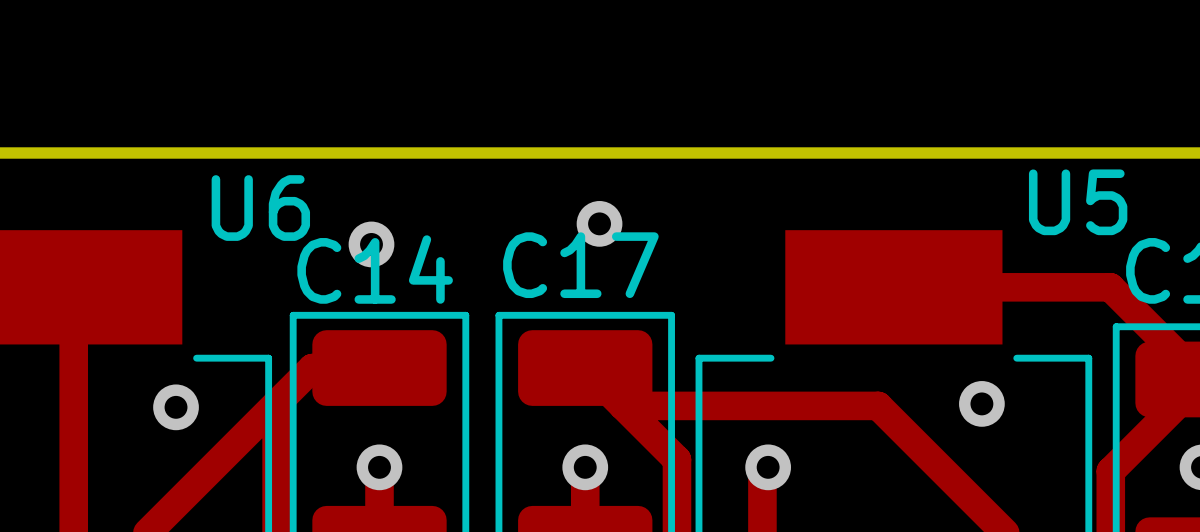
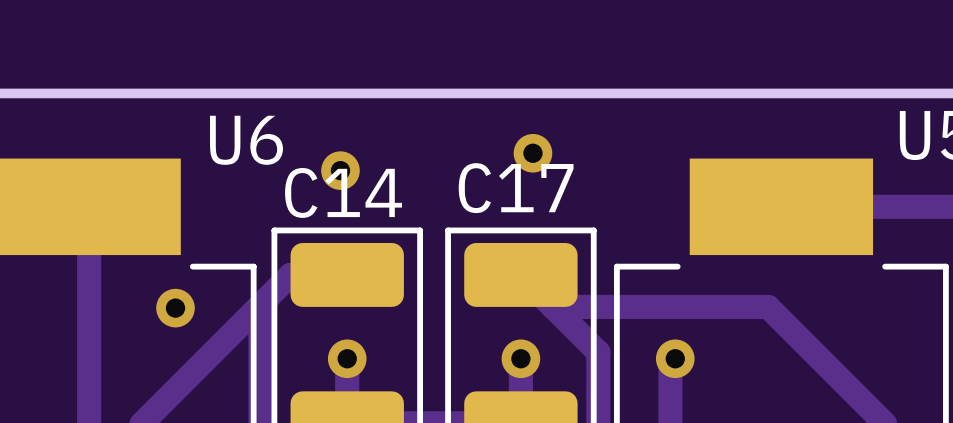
via: (981, 403) -> none

